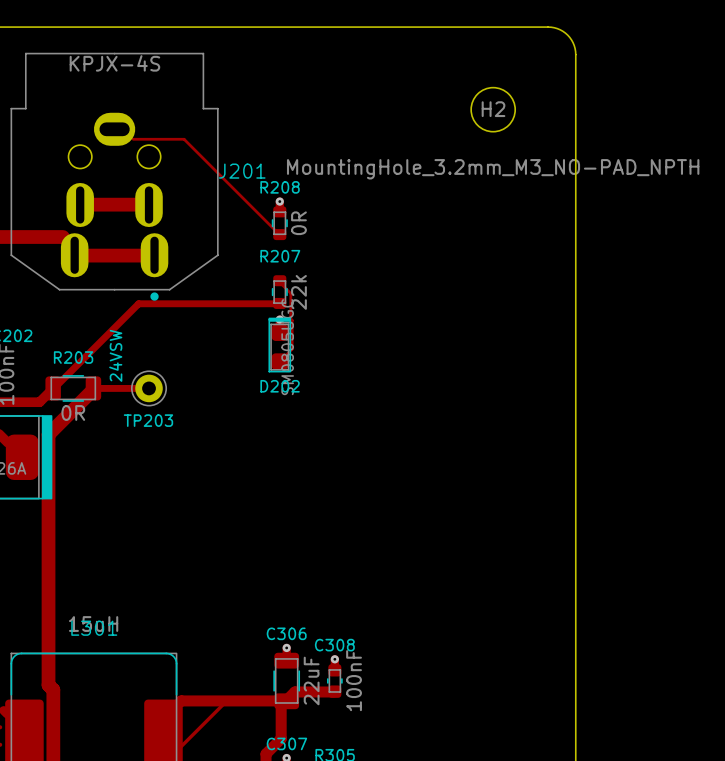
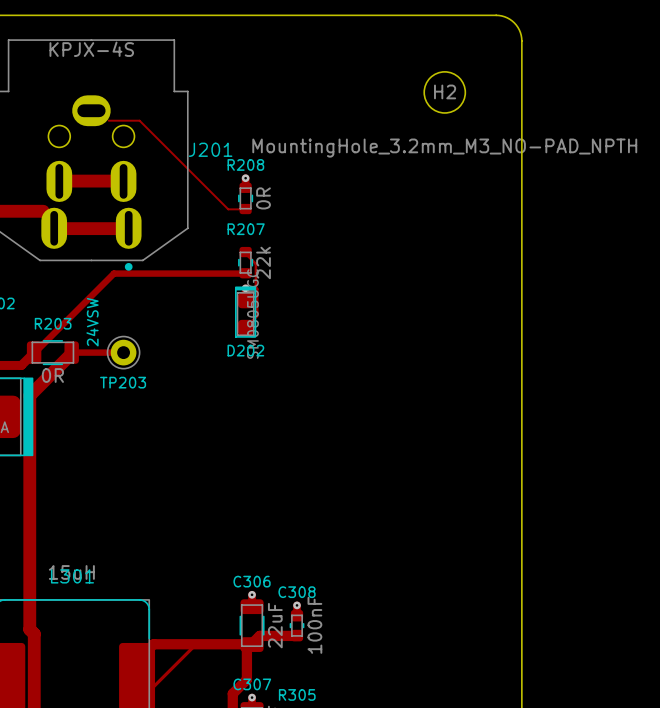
track: (133, 139) (184, 139) (279, 234) -> none
track: none -> (108, 120) (139, 120) (228, 209) (244, 209)

